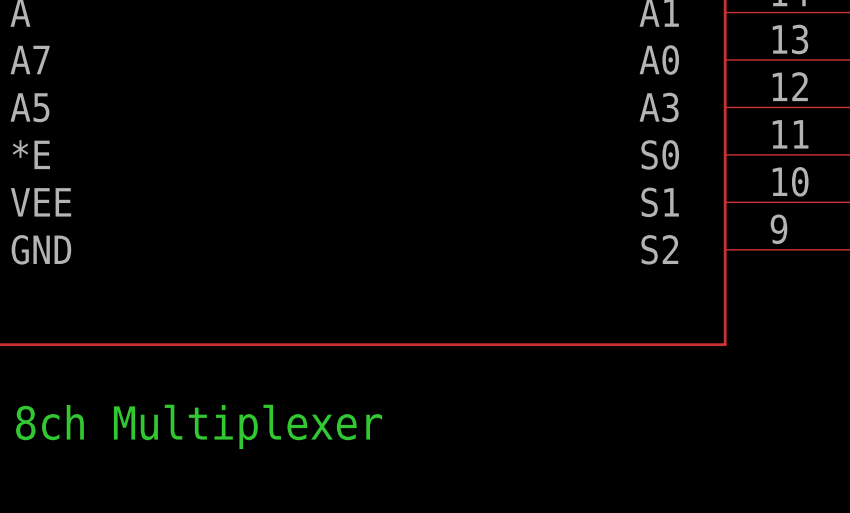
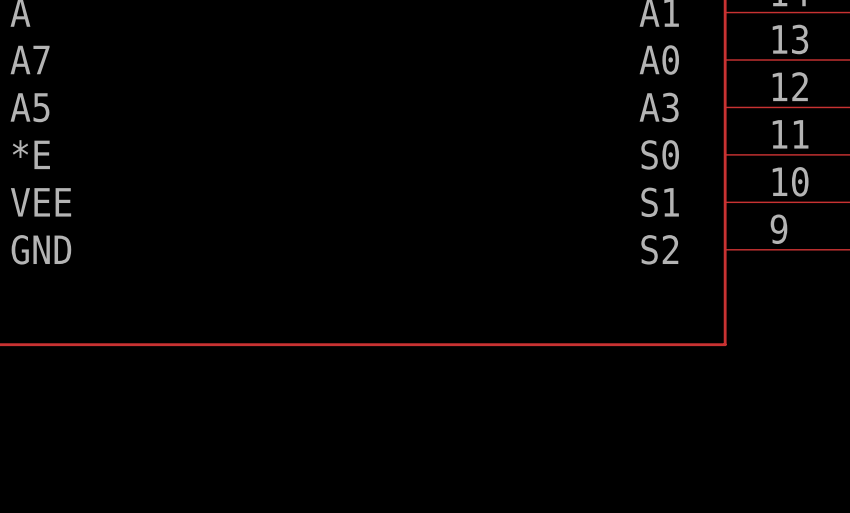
text: 8ch Multiplexer (199, 426) -> none

